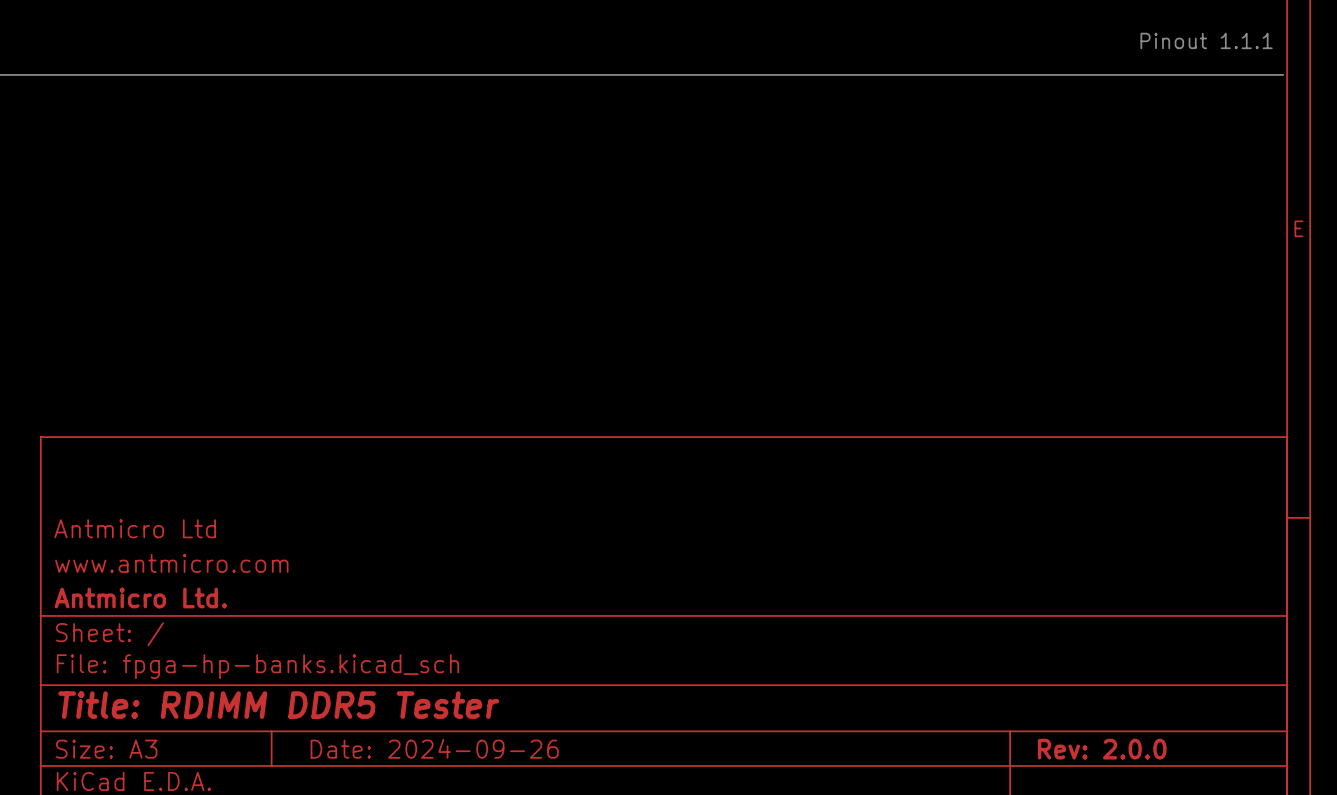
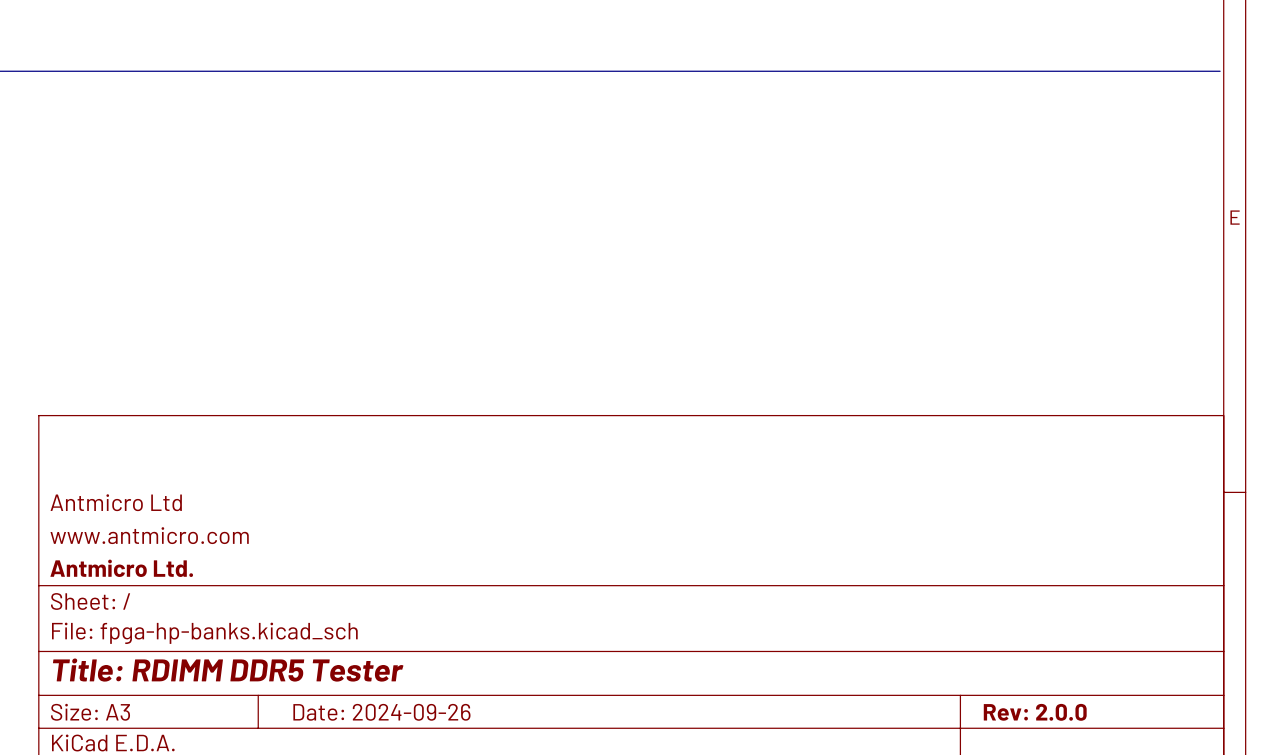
text: Pinout 1.1.1 (1206, 40) -> none

